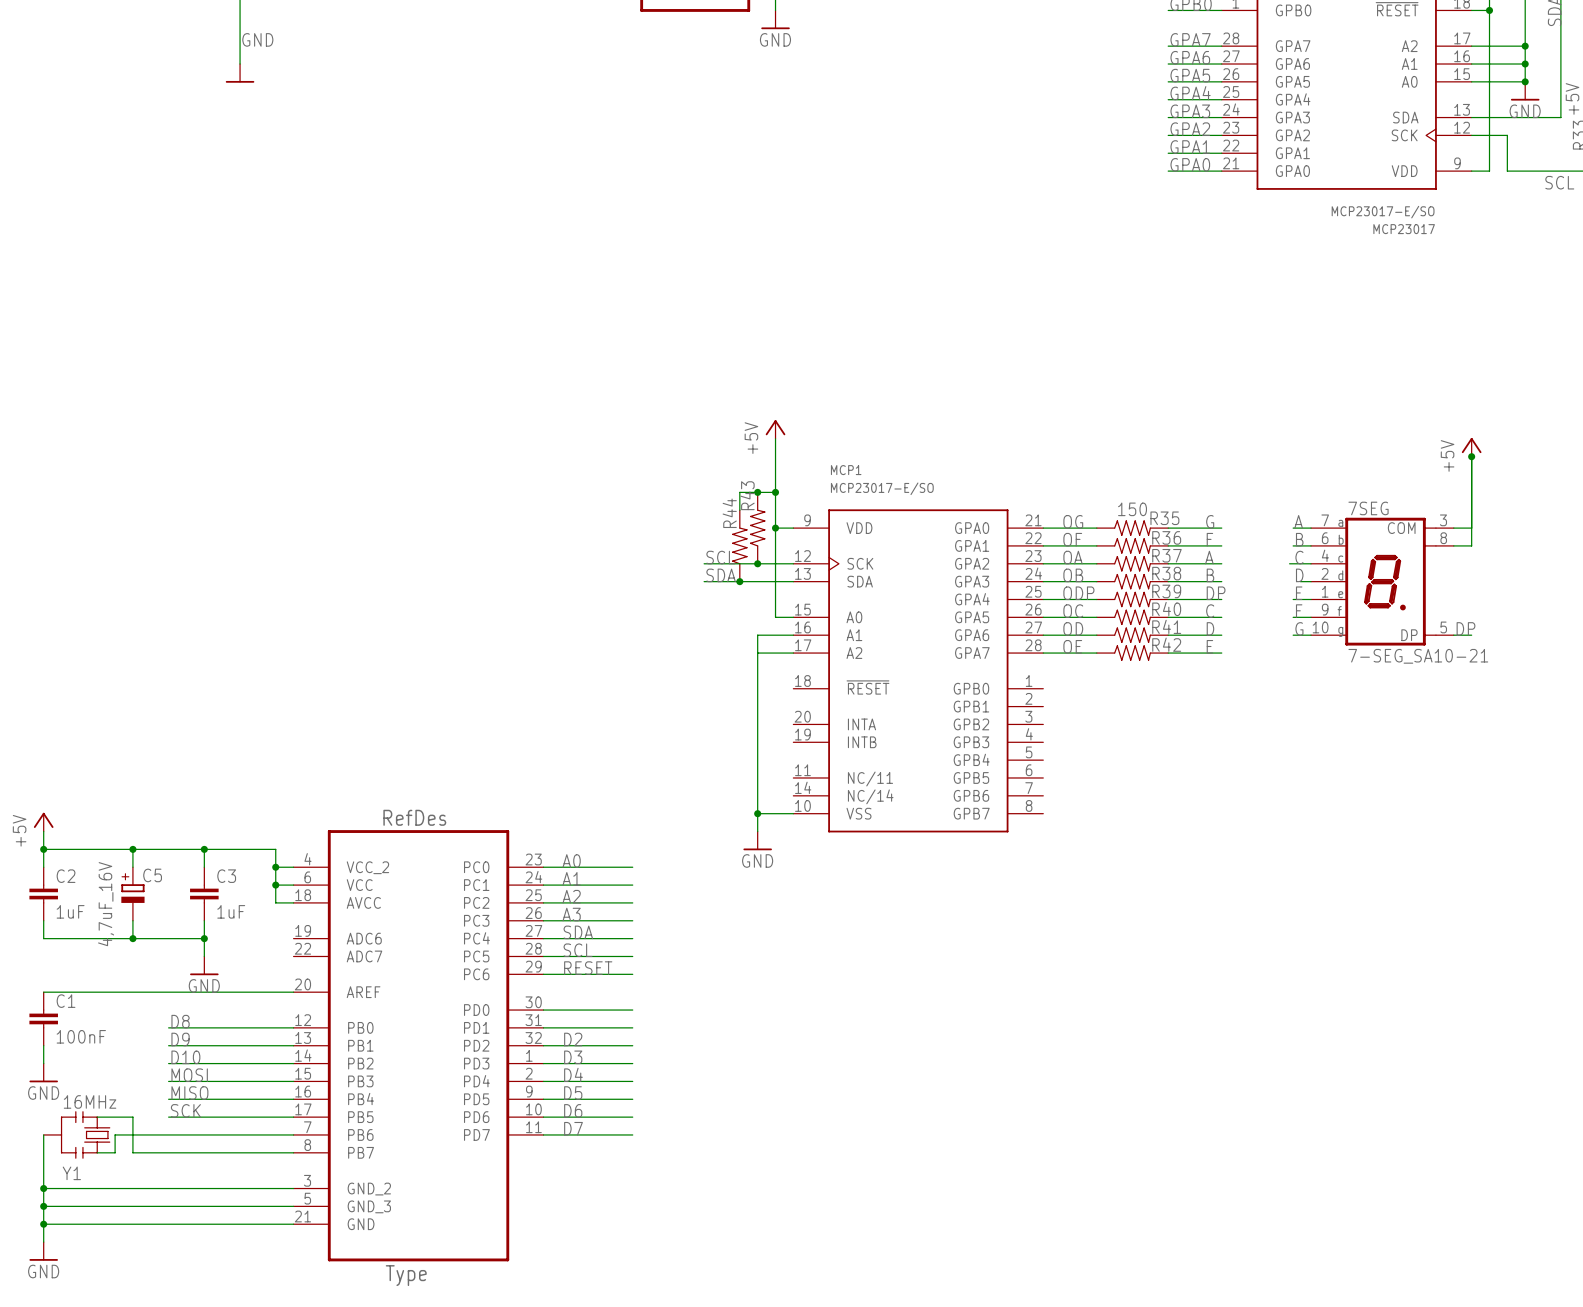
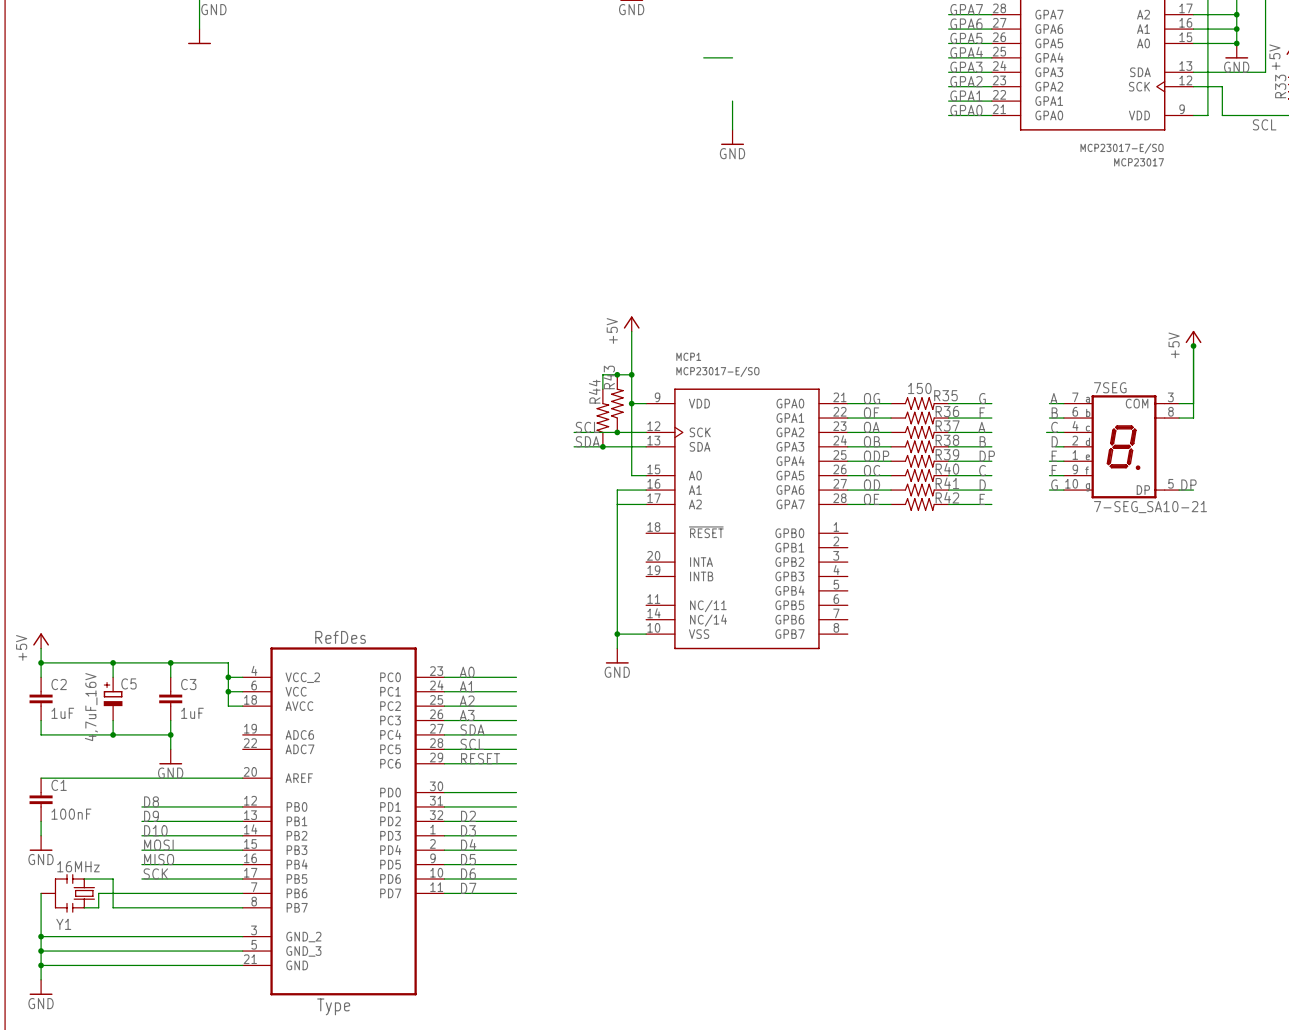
wire: none -> (703, 57) (732, 57)
wire: none -> (732, 101) (732, 129)
power symbol: none -> GND (732, 137)

